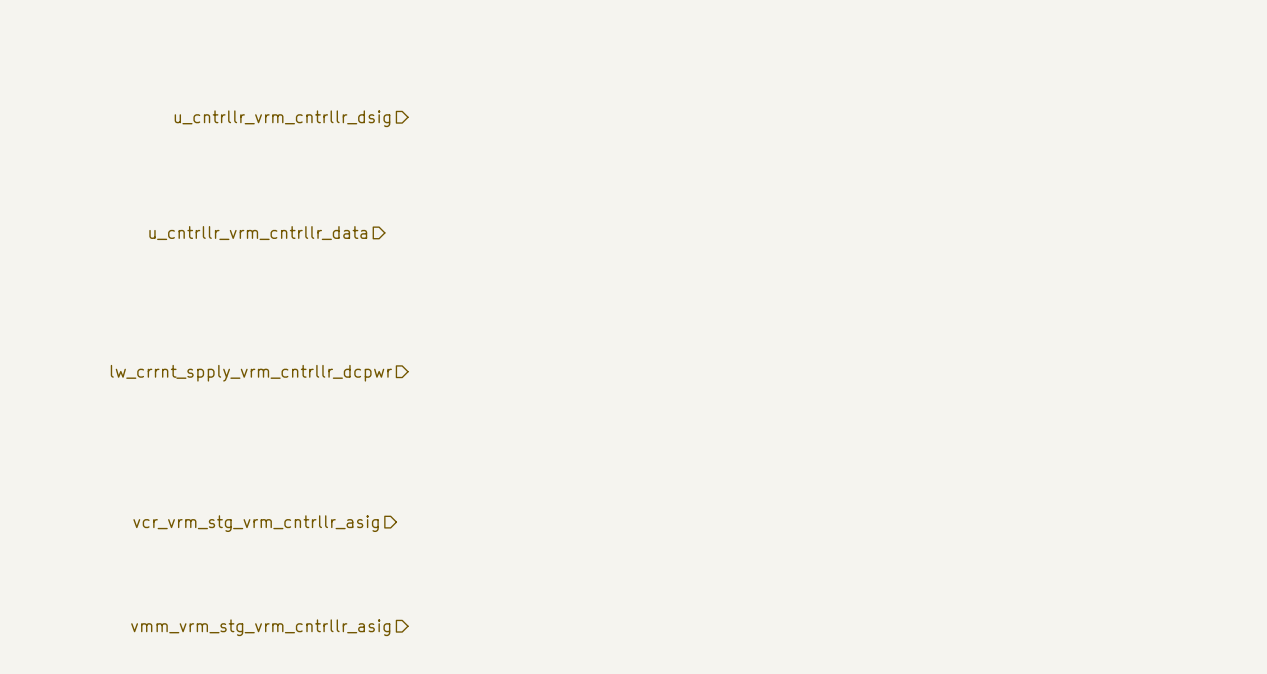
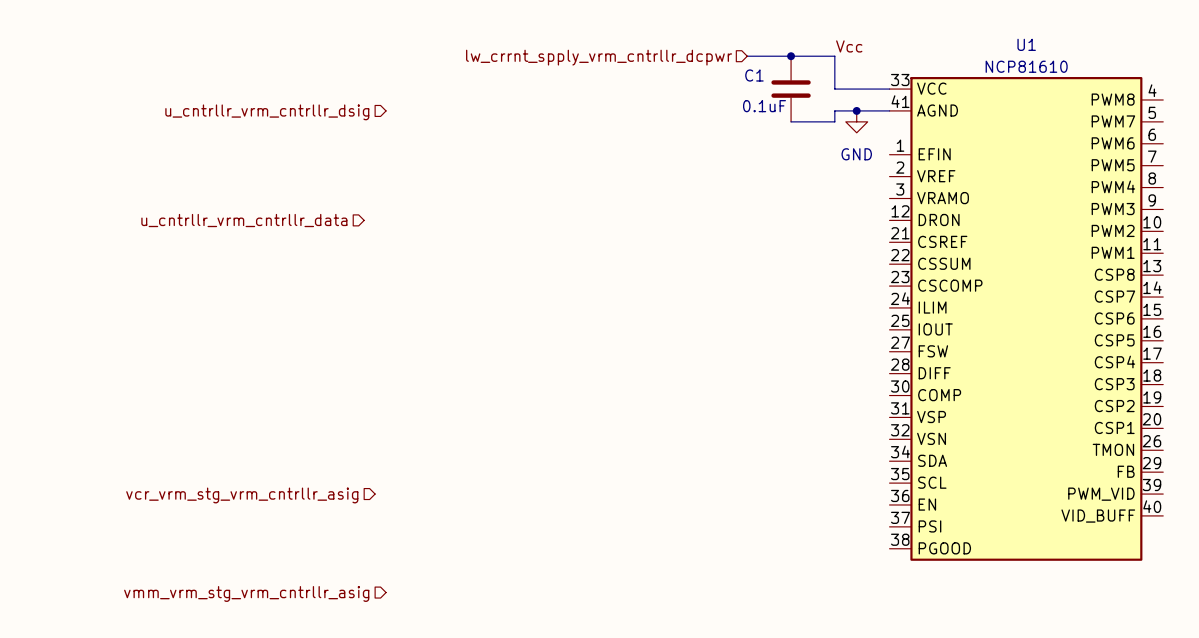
label: none -> Vcc (849, 46)
wire: none -> (747, 56) (834, 56) (834, 89) (889, 89)
junction: none -> (791, 56)
hierarchical label: none -> lw_crrnt_spply_vrm_cntrllr_dcpwr (599, 57)
C1: none -> 0.1uF (791, 89)
junction: none -> (856, 110)
wire: none -> (889, 110) (834, 110) (834, 121) (791, 121)
power symbol: none -> GND (856, 121)
U1: none -> NCP81610 (1026, 318)
hierarchical label: lw_crrnt_spply_vrm_cntrllr_dcpwr (251, 373) -> none

